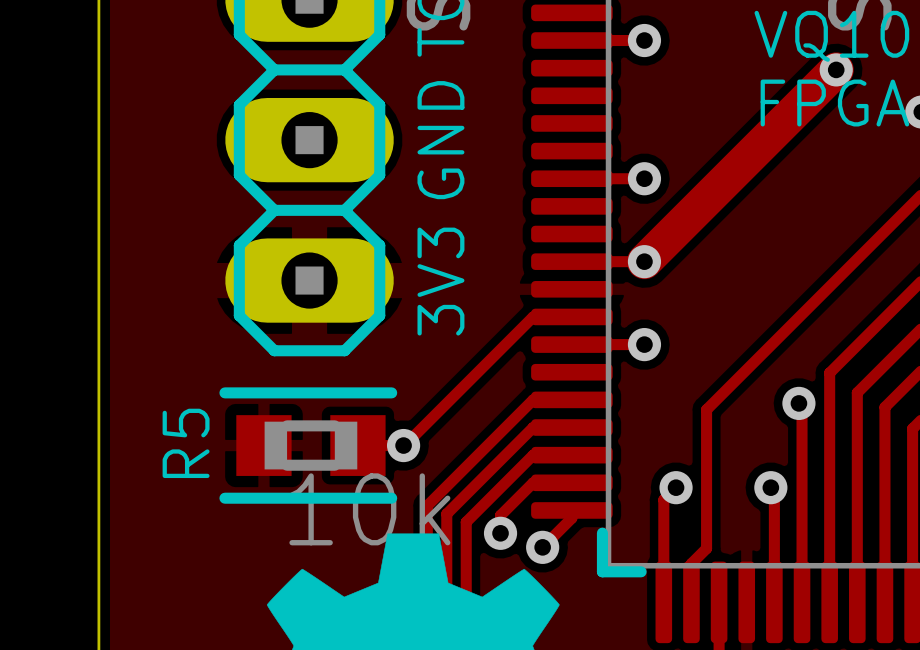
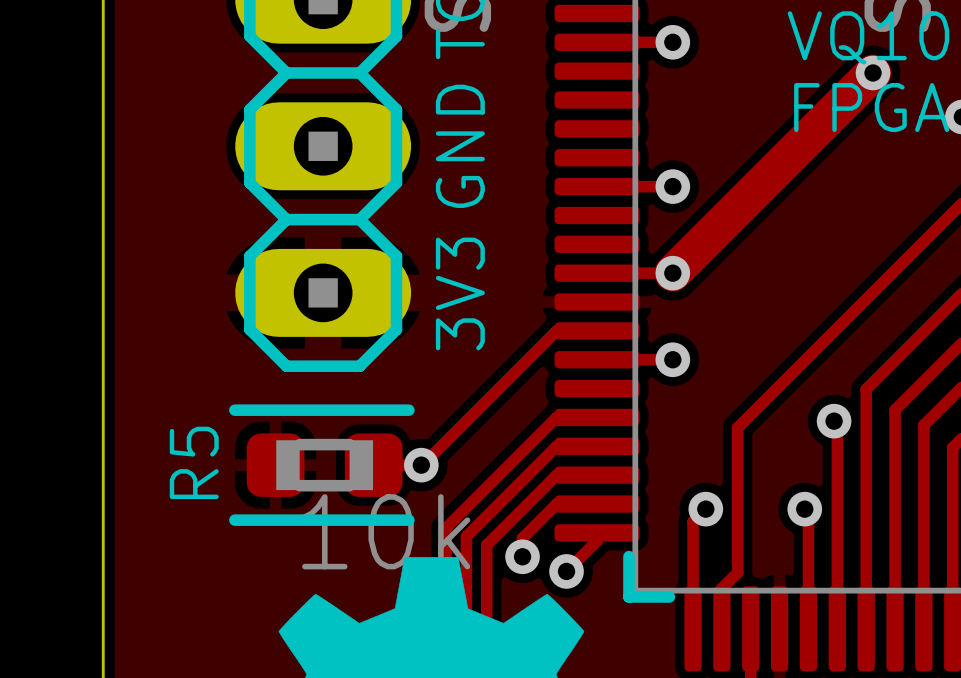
R5 footprint: [219, 387, 398, 504] -> [229, 404, 415, 526]

